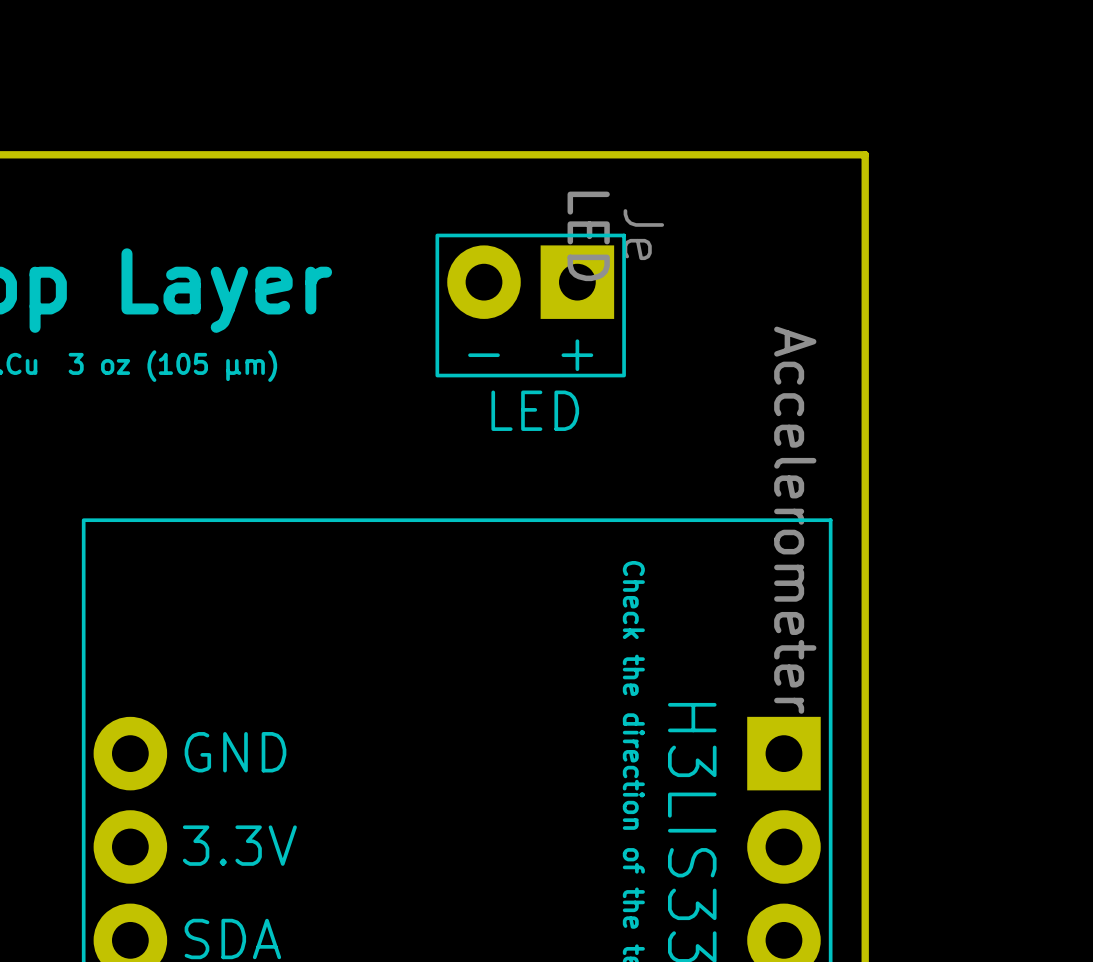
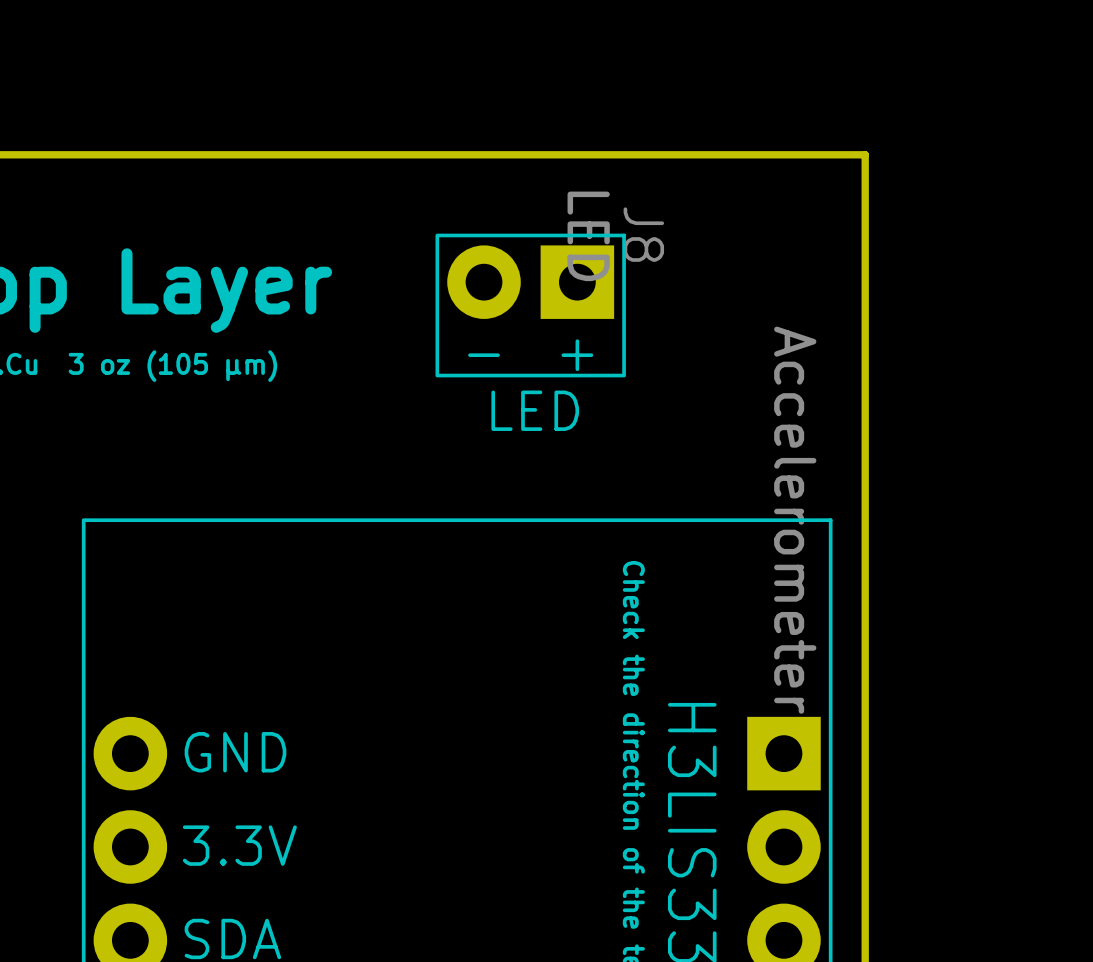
Je name: Je (643, 234) -> J8 (643, 234)

